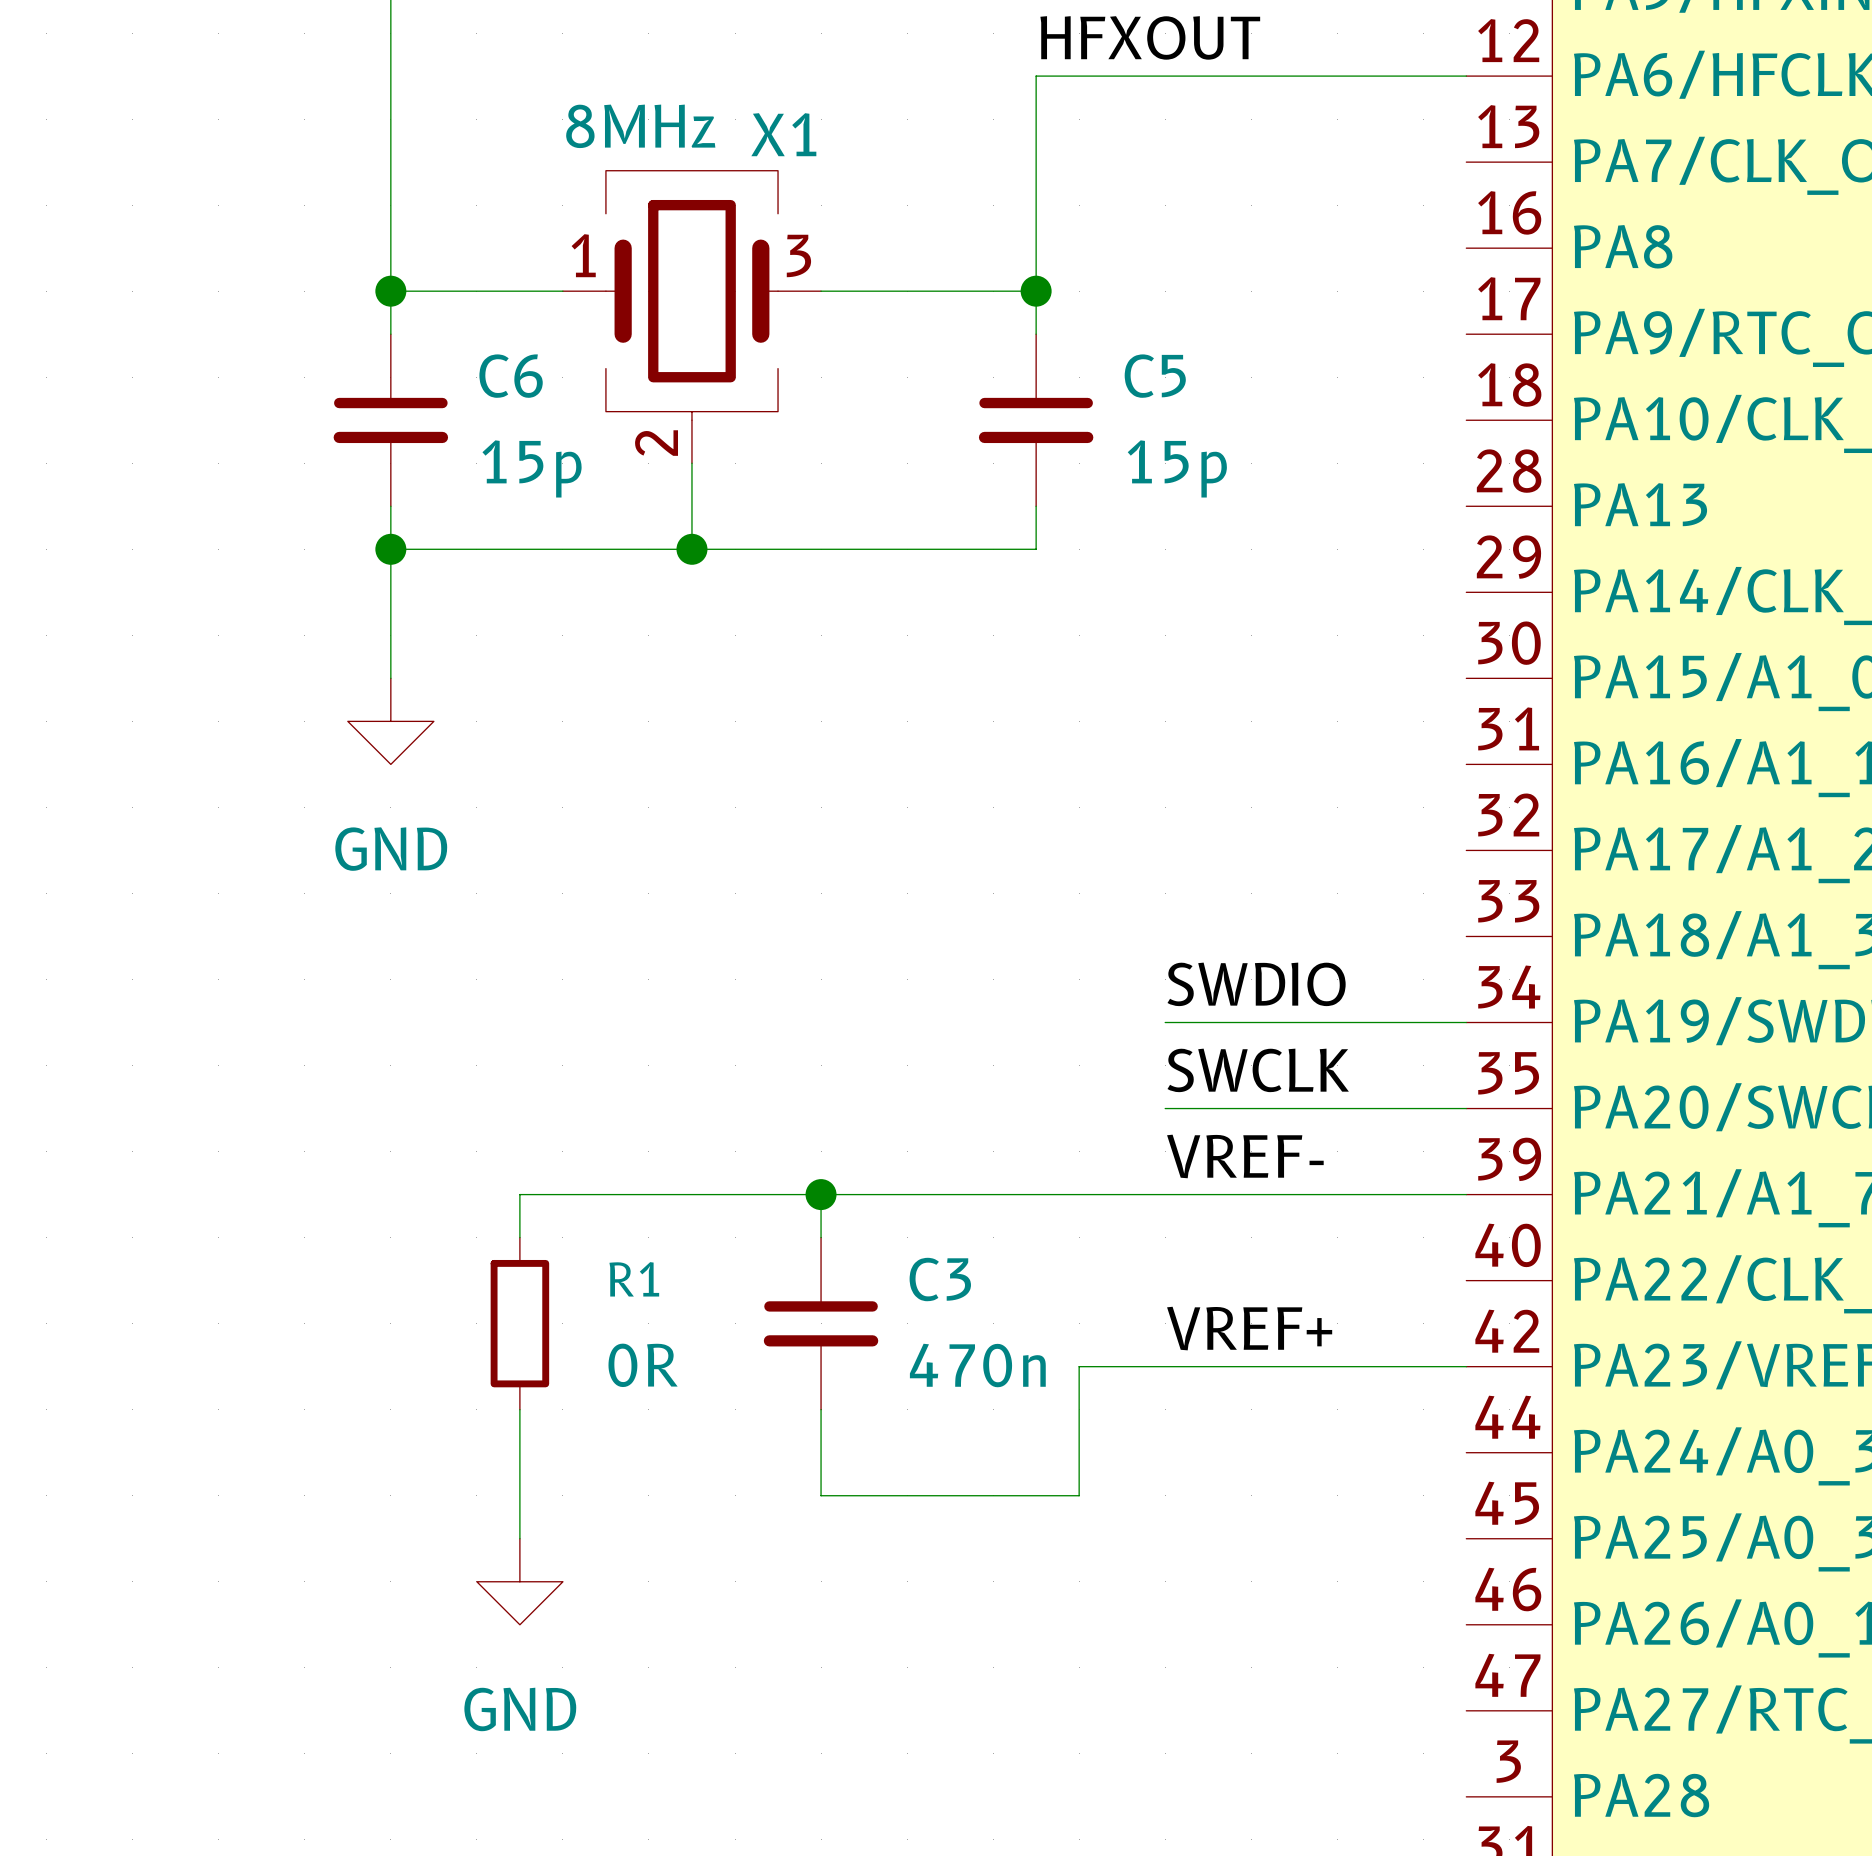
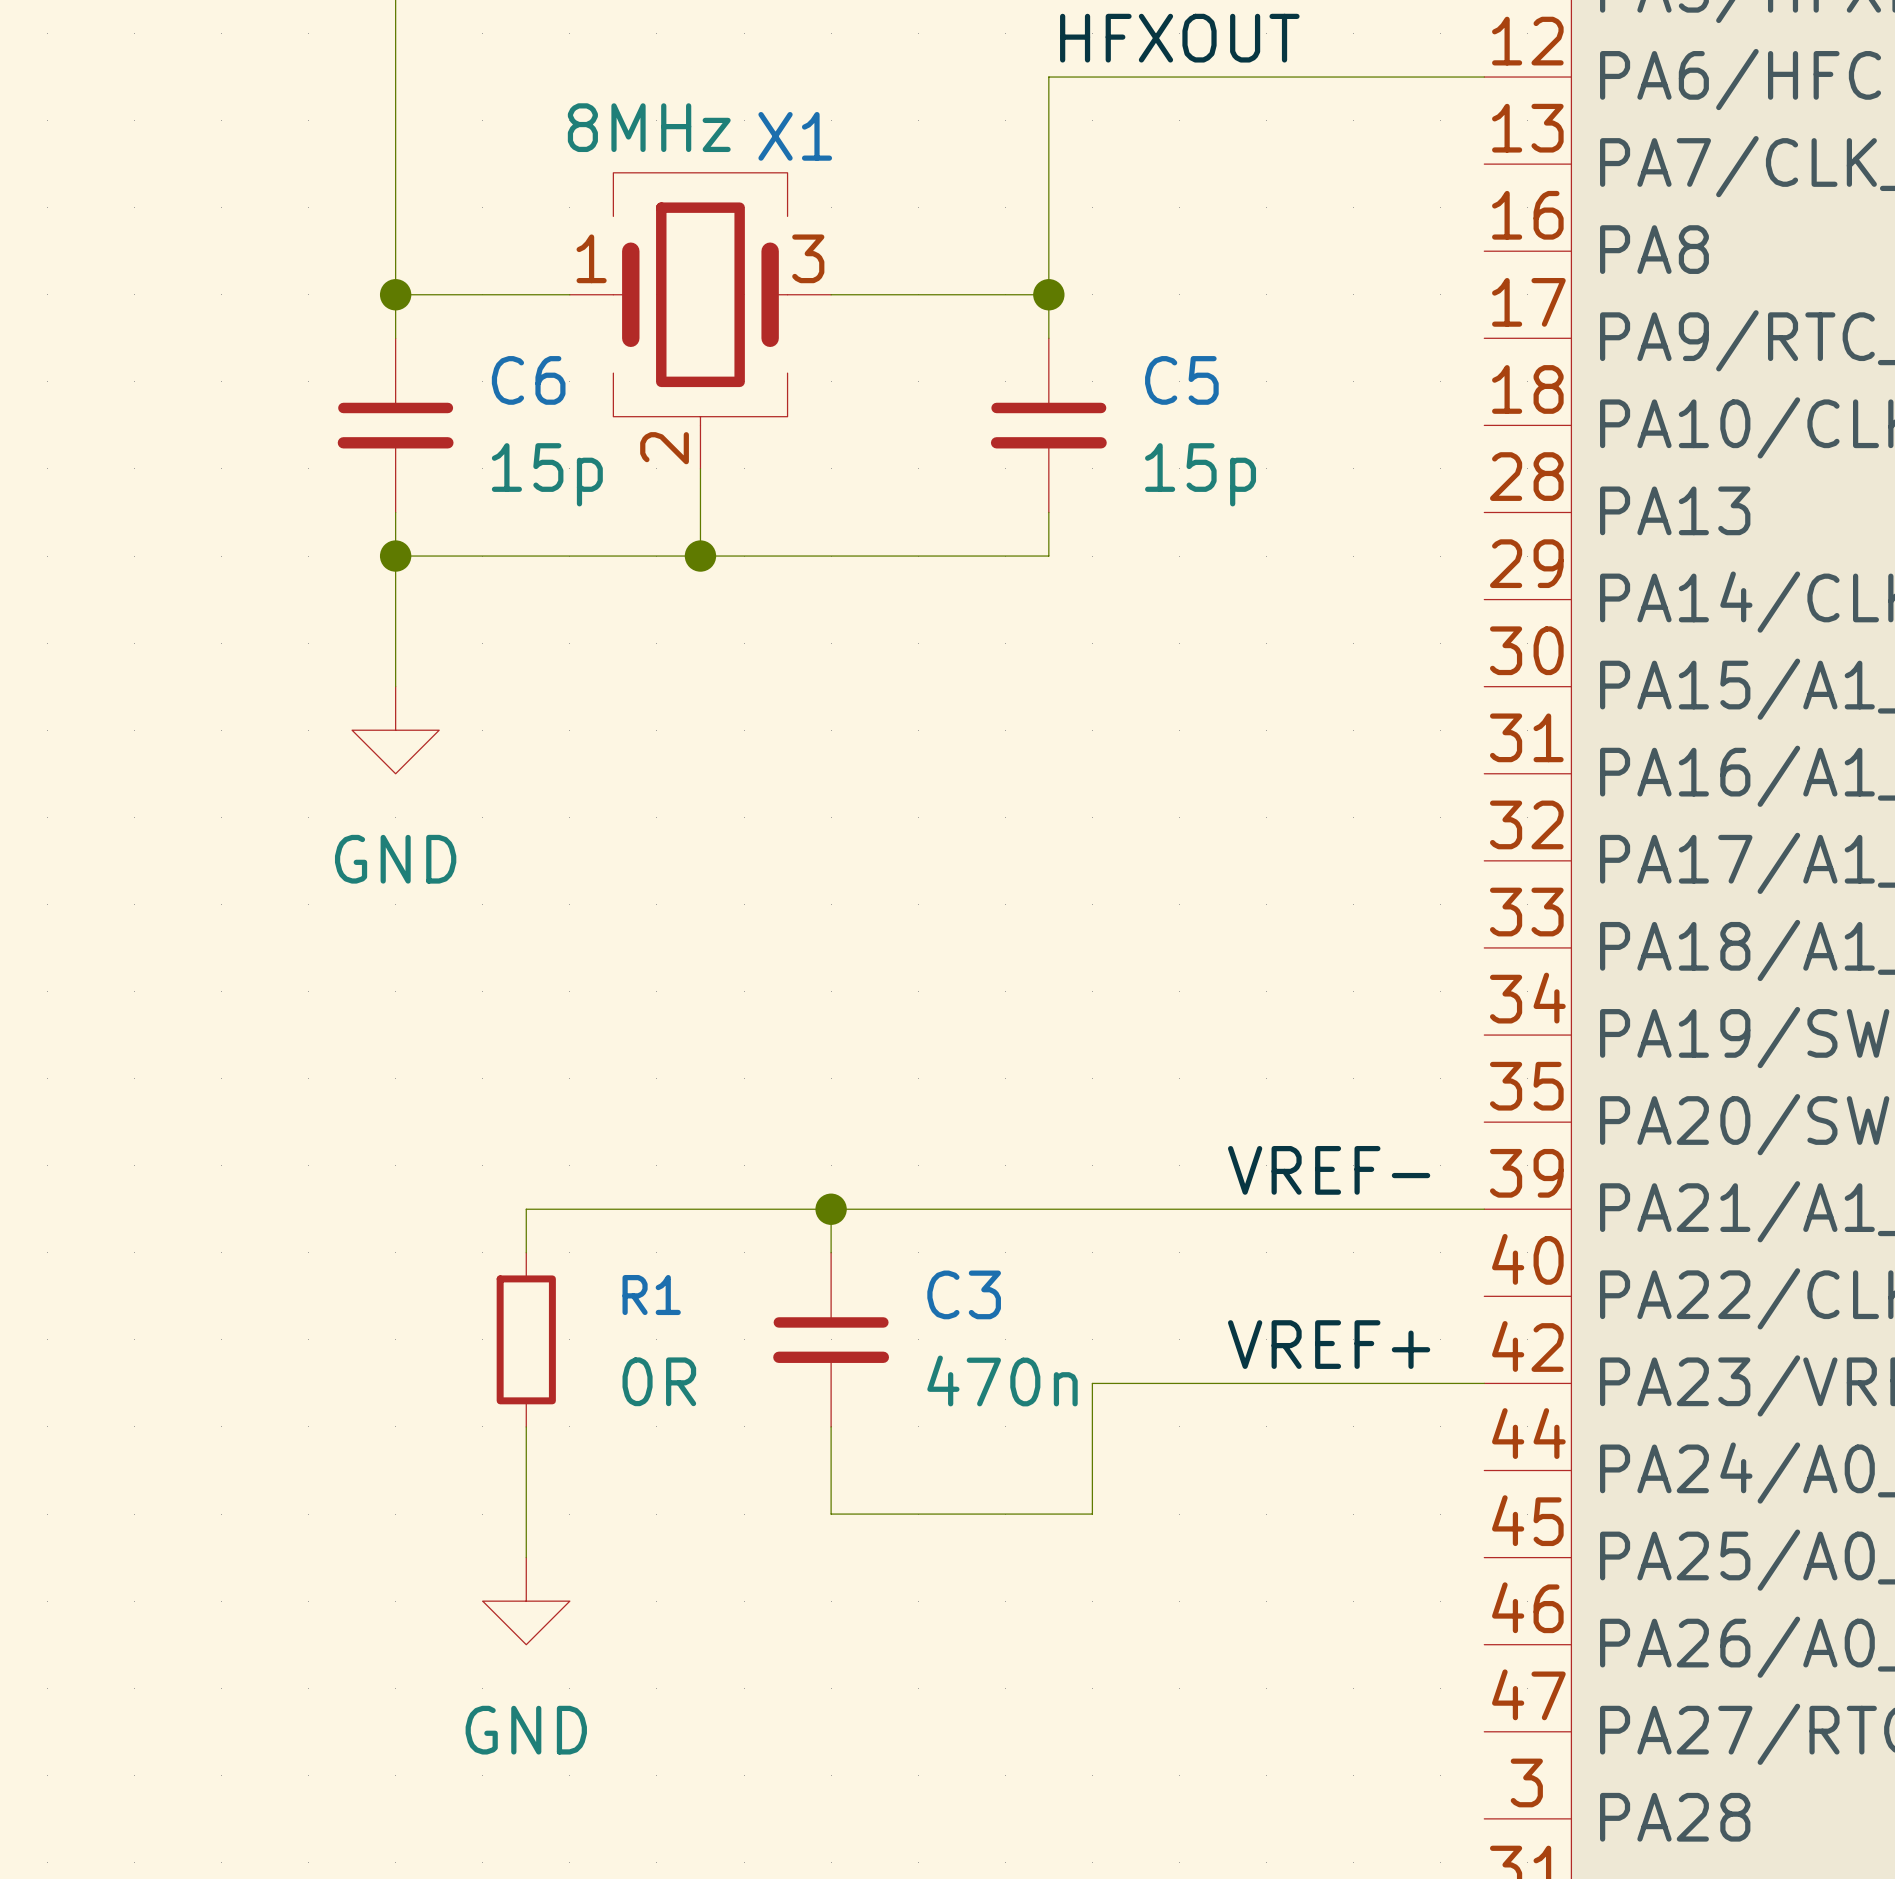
label: SWDIO (1256, 984) -> none
wire: (1165, 1022) (1466, 1022) -> none
label: SWCLK (1258, 1070) -> none
wire: (1165, 1108) (1466, 1108) -> none
label position: VREF- (1245, 1156) -> VREF- (1329, 1170)
label position: VREF+ (1249, 1328) -> VREF+ (1329, 1344)

